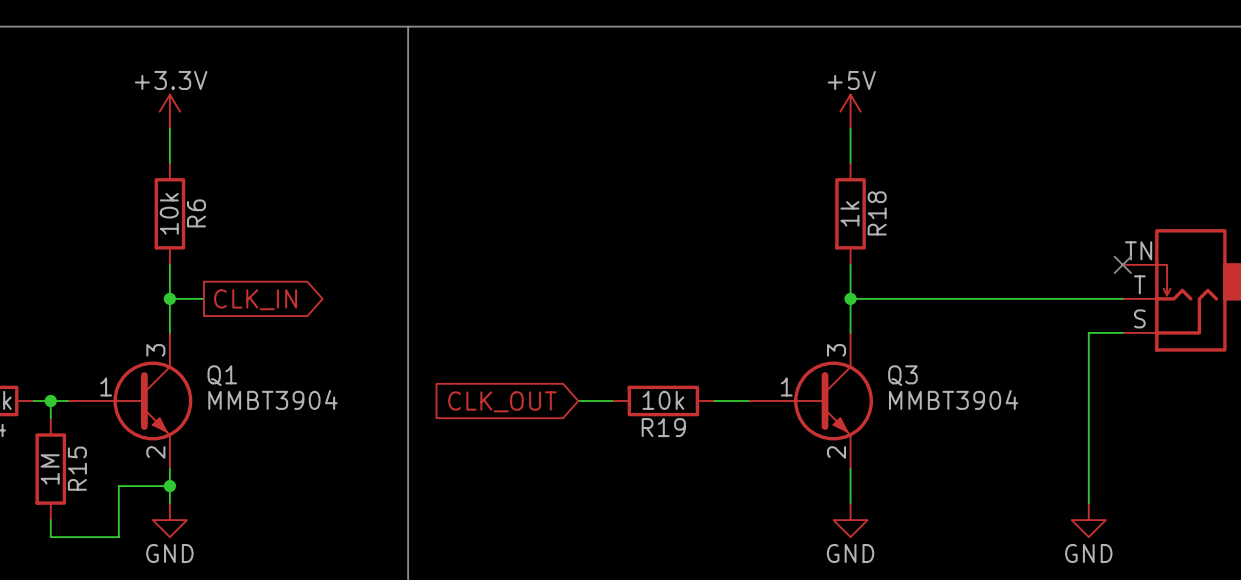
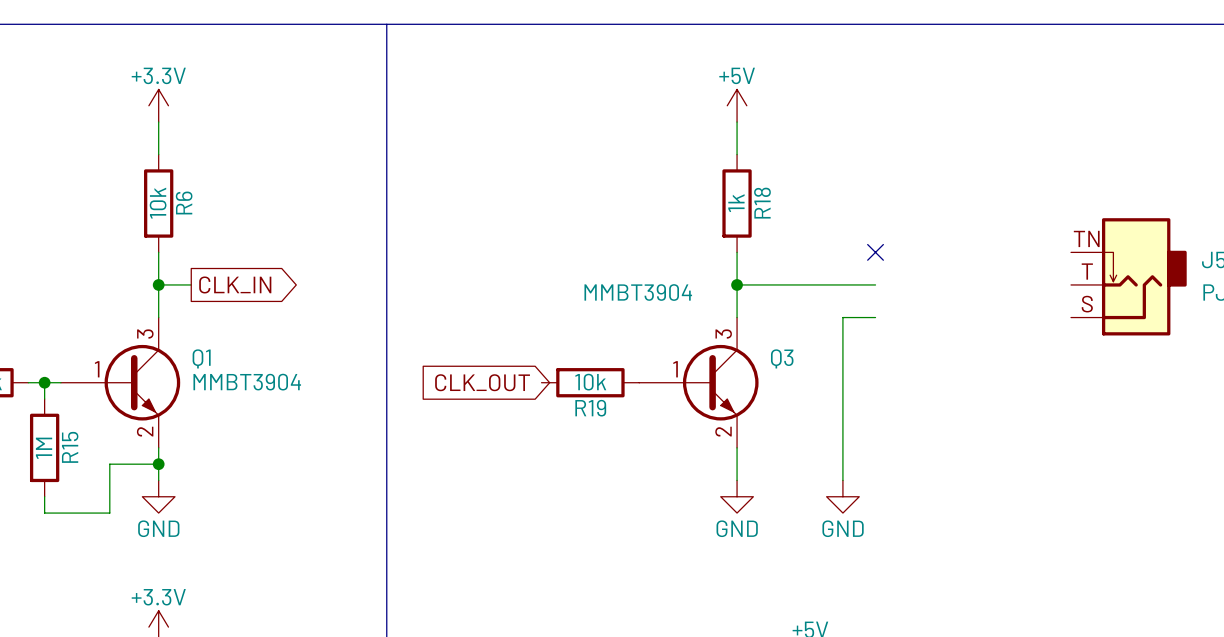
power symbol position: +5V (850, 111) -> +5V (737, 105)
wire: (850, 128) (850, 162) -> (737, 122) (737, 154)
R18 position: (850, 213) -> (737, 203)
wire: (850, 264) (850, 332) -> (737, 252) (737, 317)
no-connect mark: none -> (875, 252)
no-connect mark: (1122, 264) -> none
wire: none -> (737, 284) (810, 284)
junction position: (850, 298) -> (737, 284)
wire: (918, 298) (1122, 298) -> none
wire: (1122, 332) (1088, 332) (1088, 503) -> (875, 317) (842, 317) (842, 480)
Q3 value position: MMBT3904 (953, 399) -> MMBT3904 (638, 292)
wire: (578, 400) (612, 400) -> none
R19 position: (663, 400) -> (590, 382)
Q3 position: (810, 400) -> (698, 382)
wire: (850, 469) (850, 503) -> (737, 447) (737, 480)
power symbol: none -> GND (737, 496)
power symbol position: GND (850, 520) -> GND (842, 496)
power symbol: GND (1088, 520) -> none

